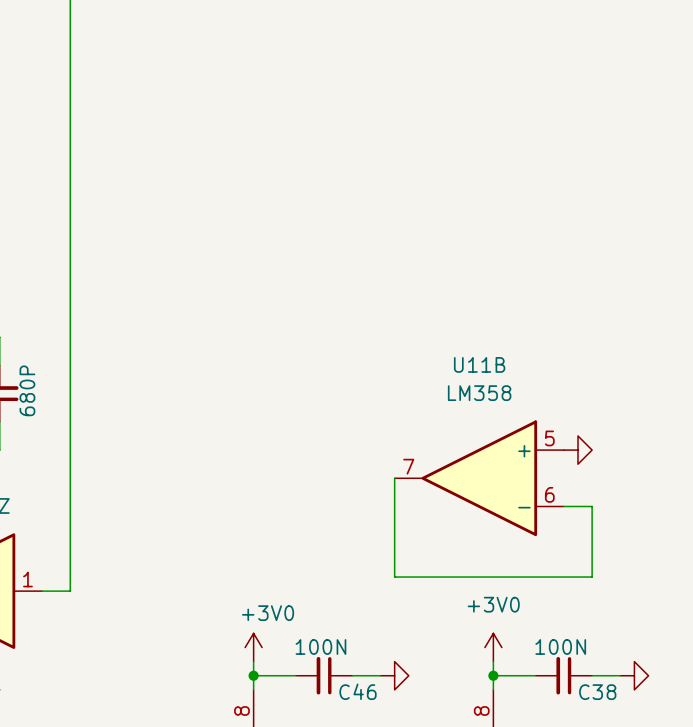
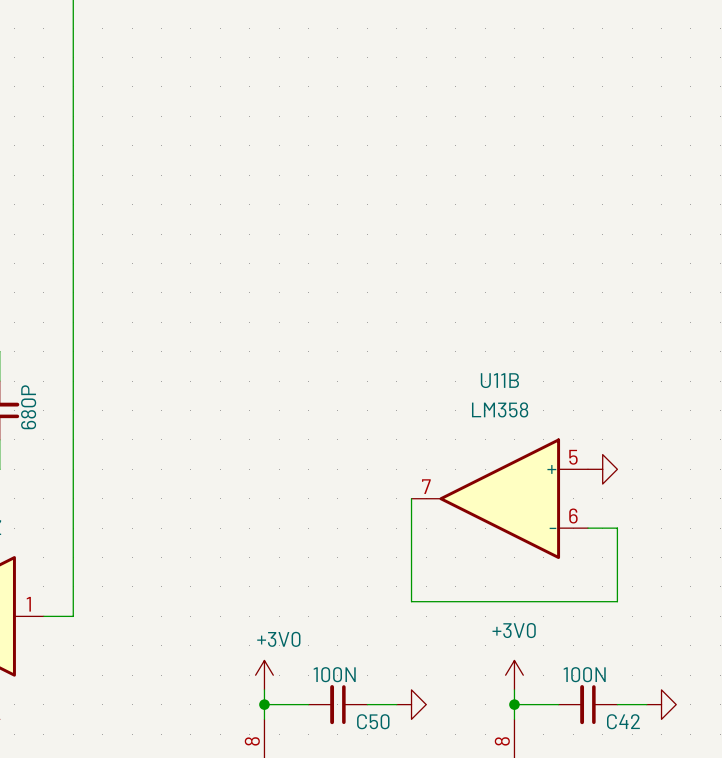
C46 name: C46 (357, 691) -> C50 (373, 721)
C38 name: C38 (597, 692) -> C42 (623, 721)

